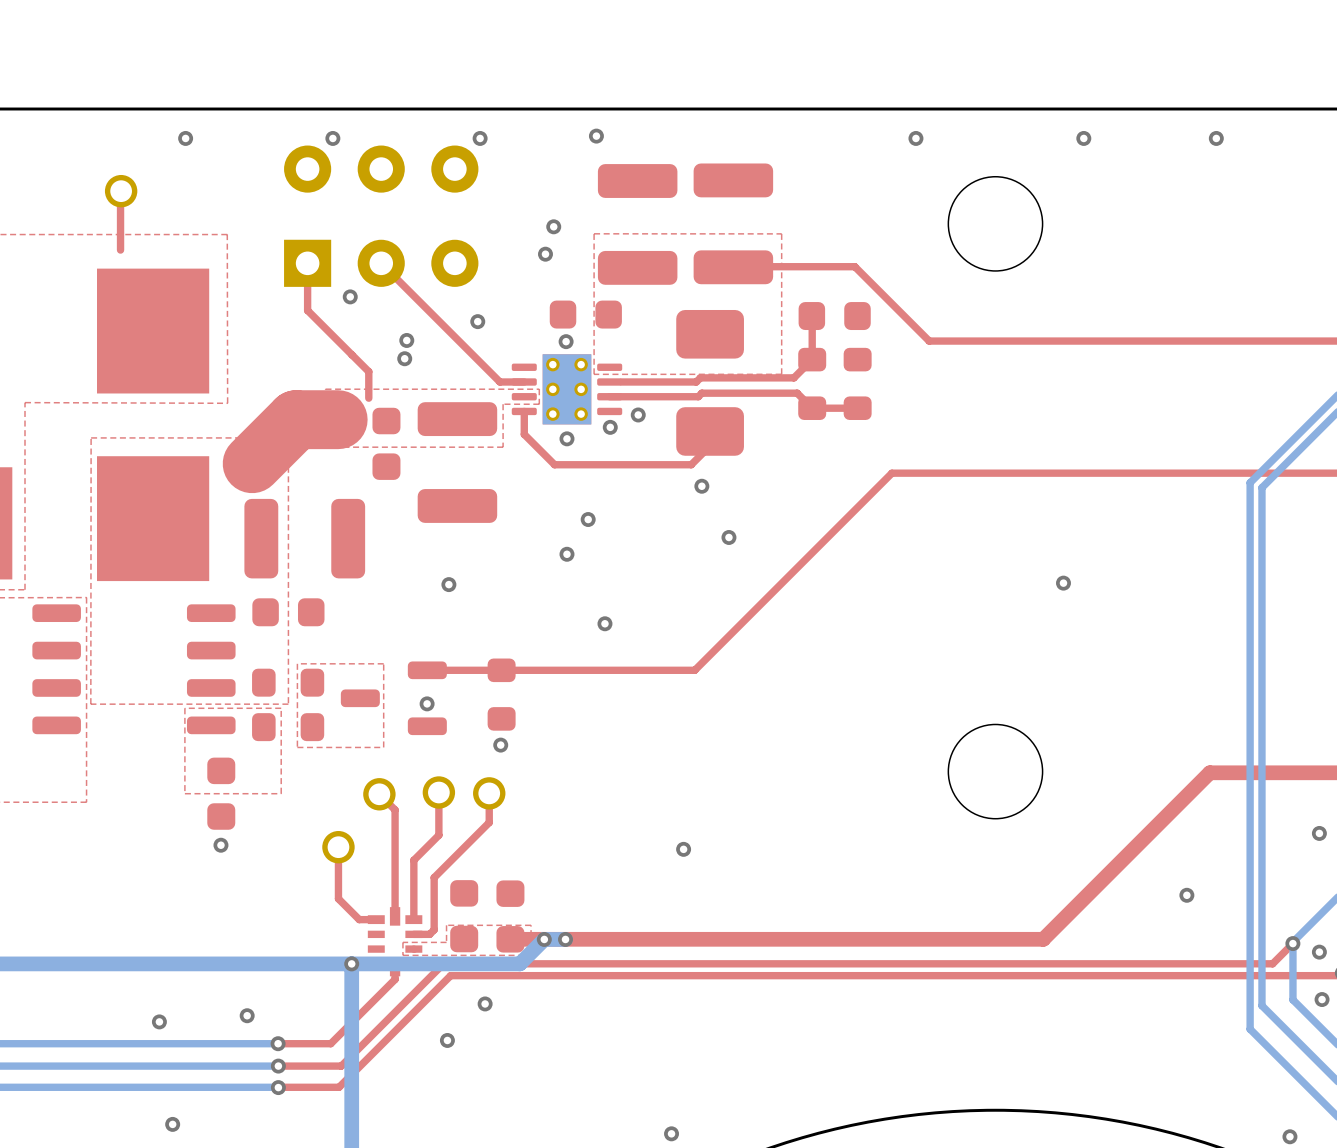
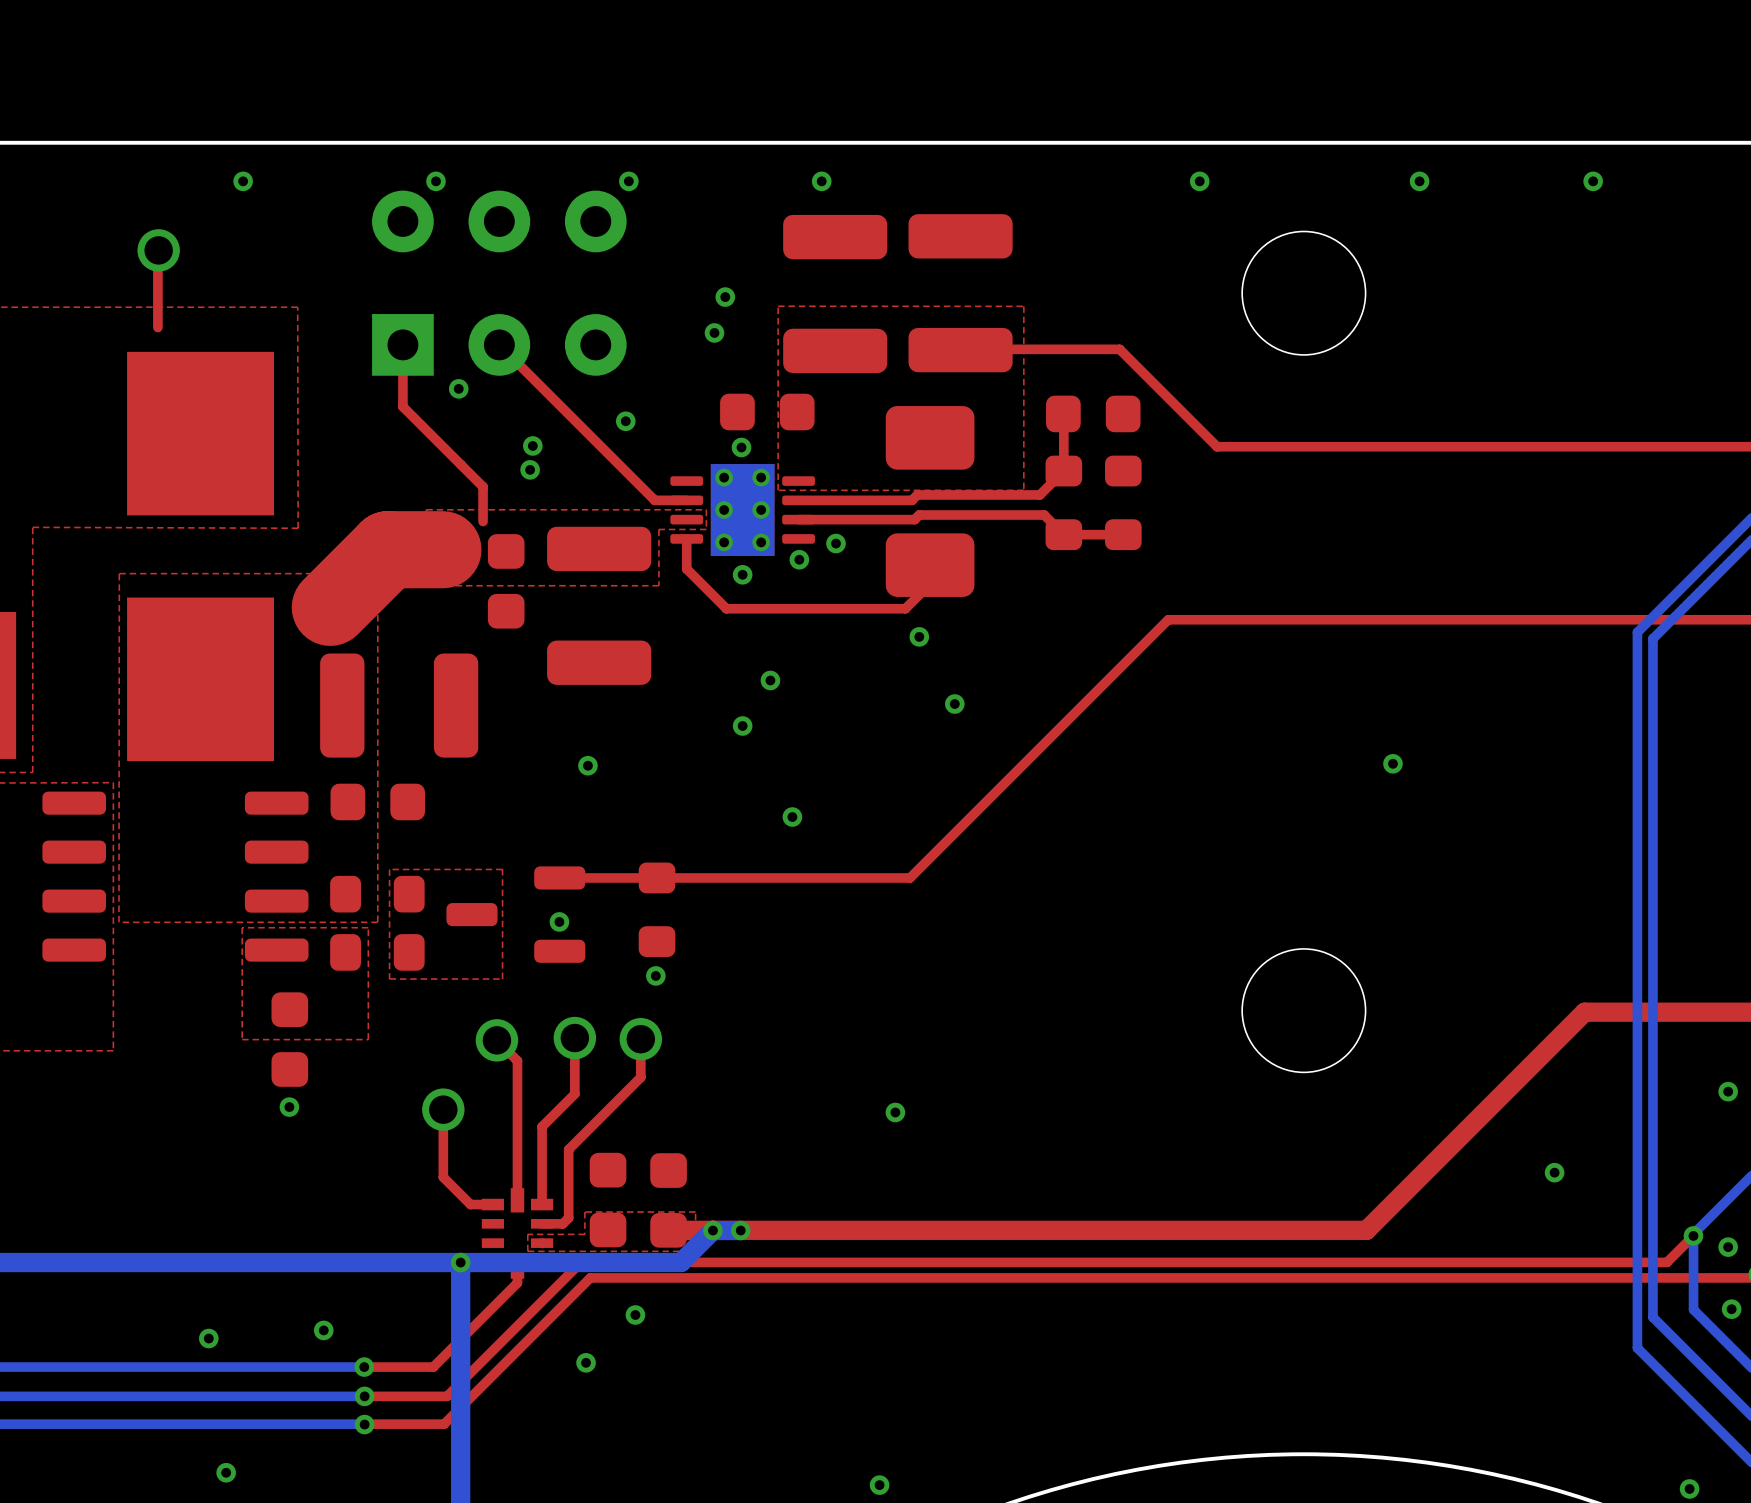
via position: (596, 136) -> (821, 181)

